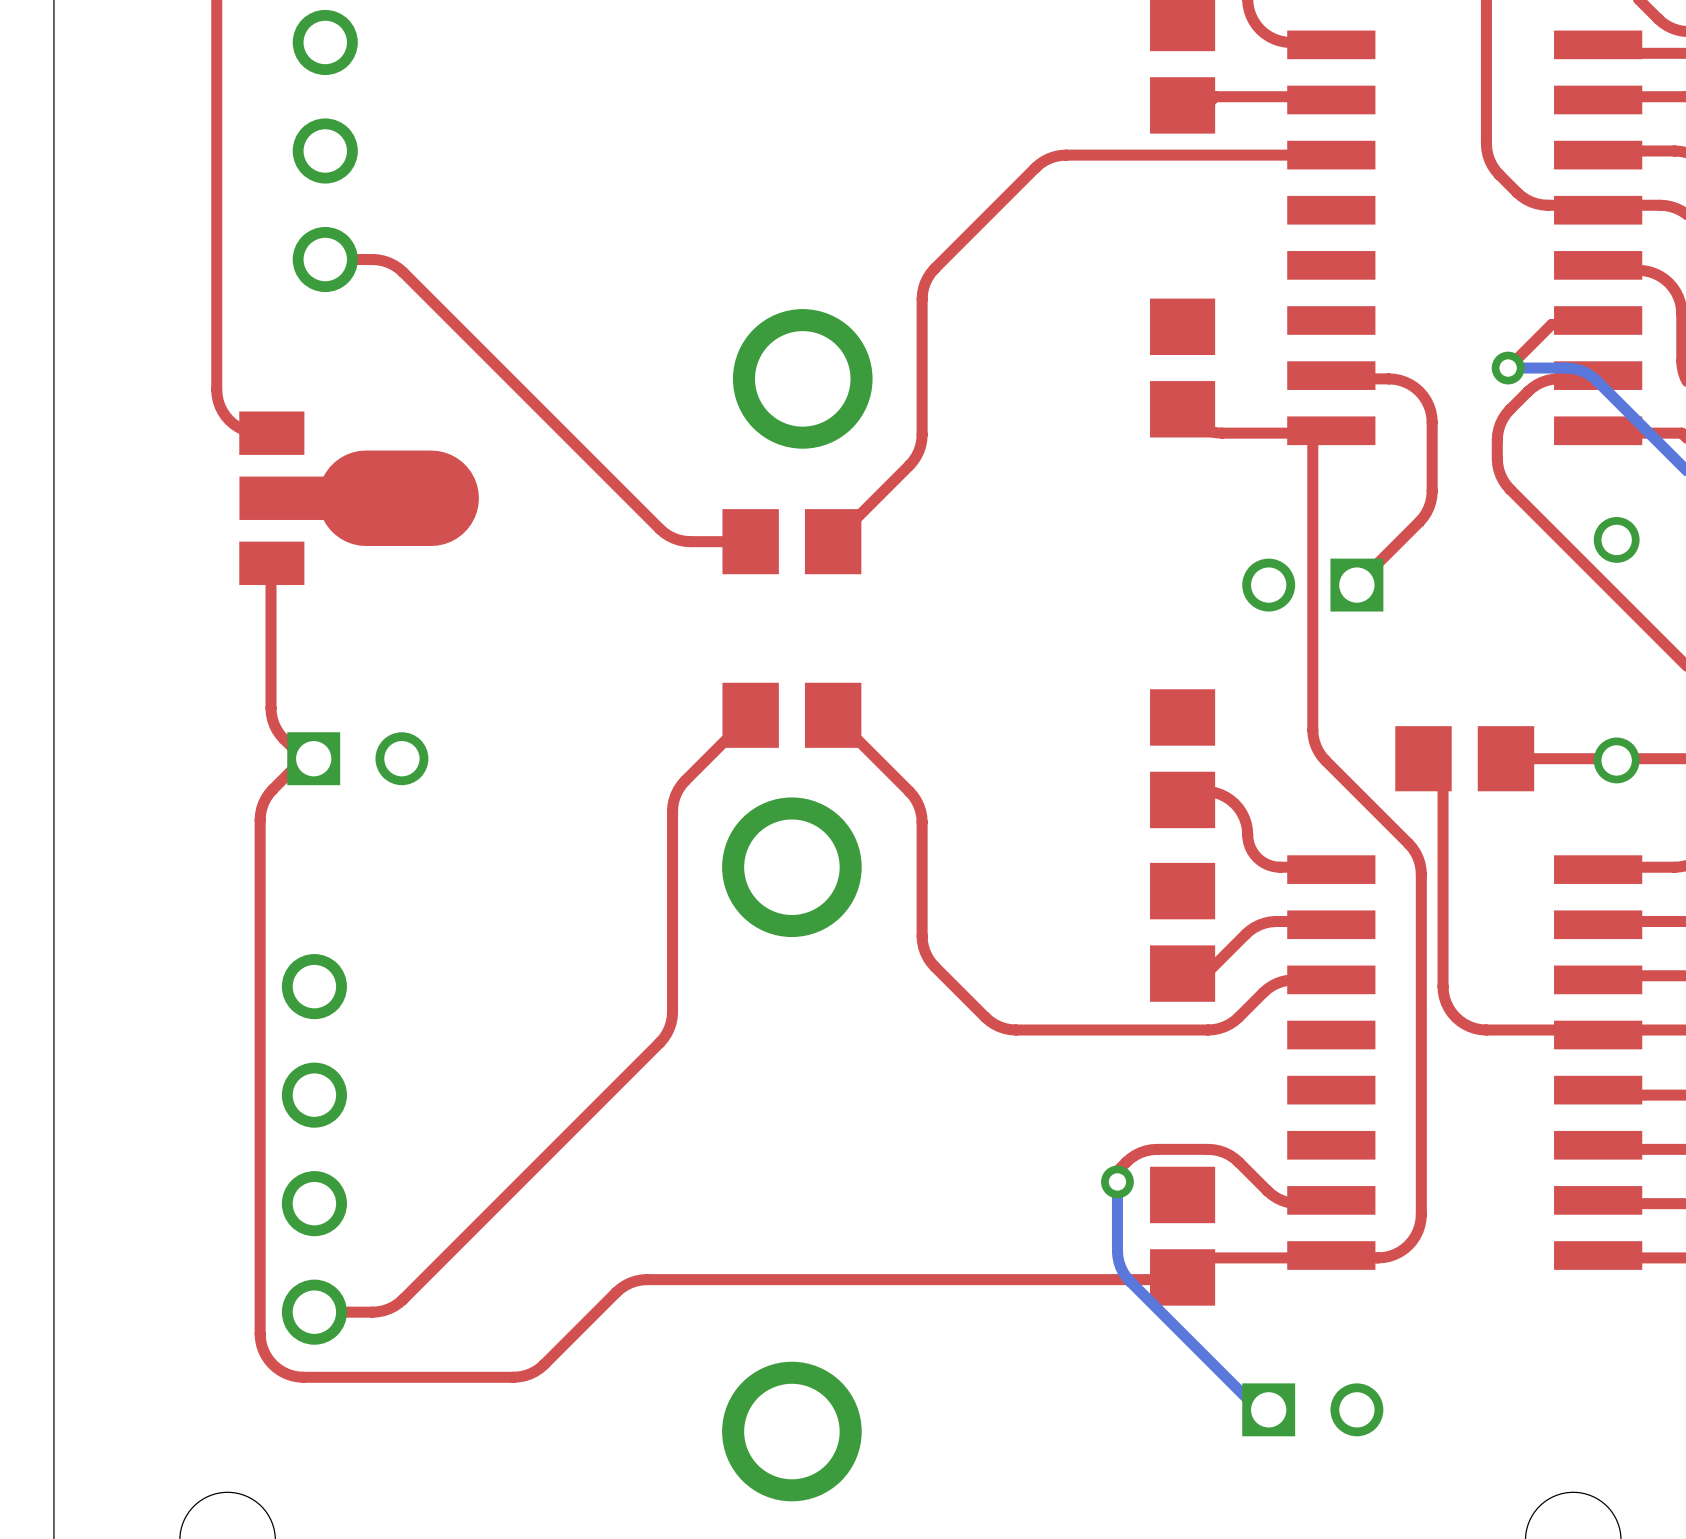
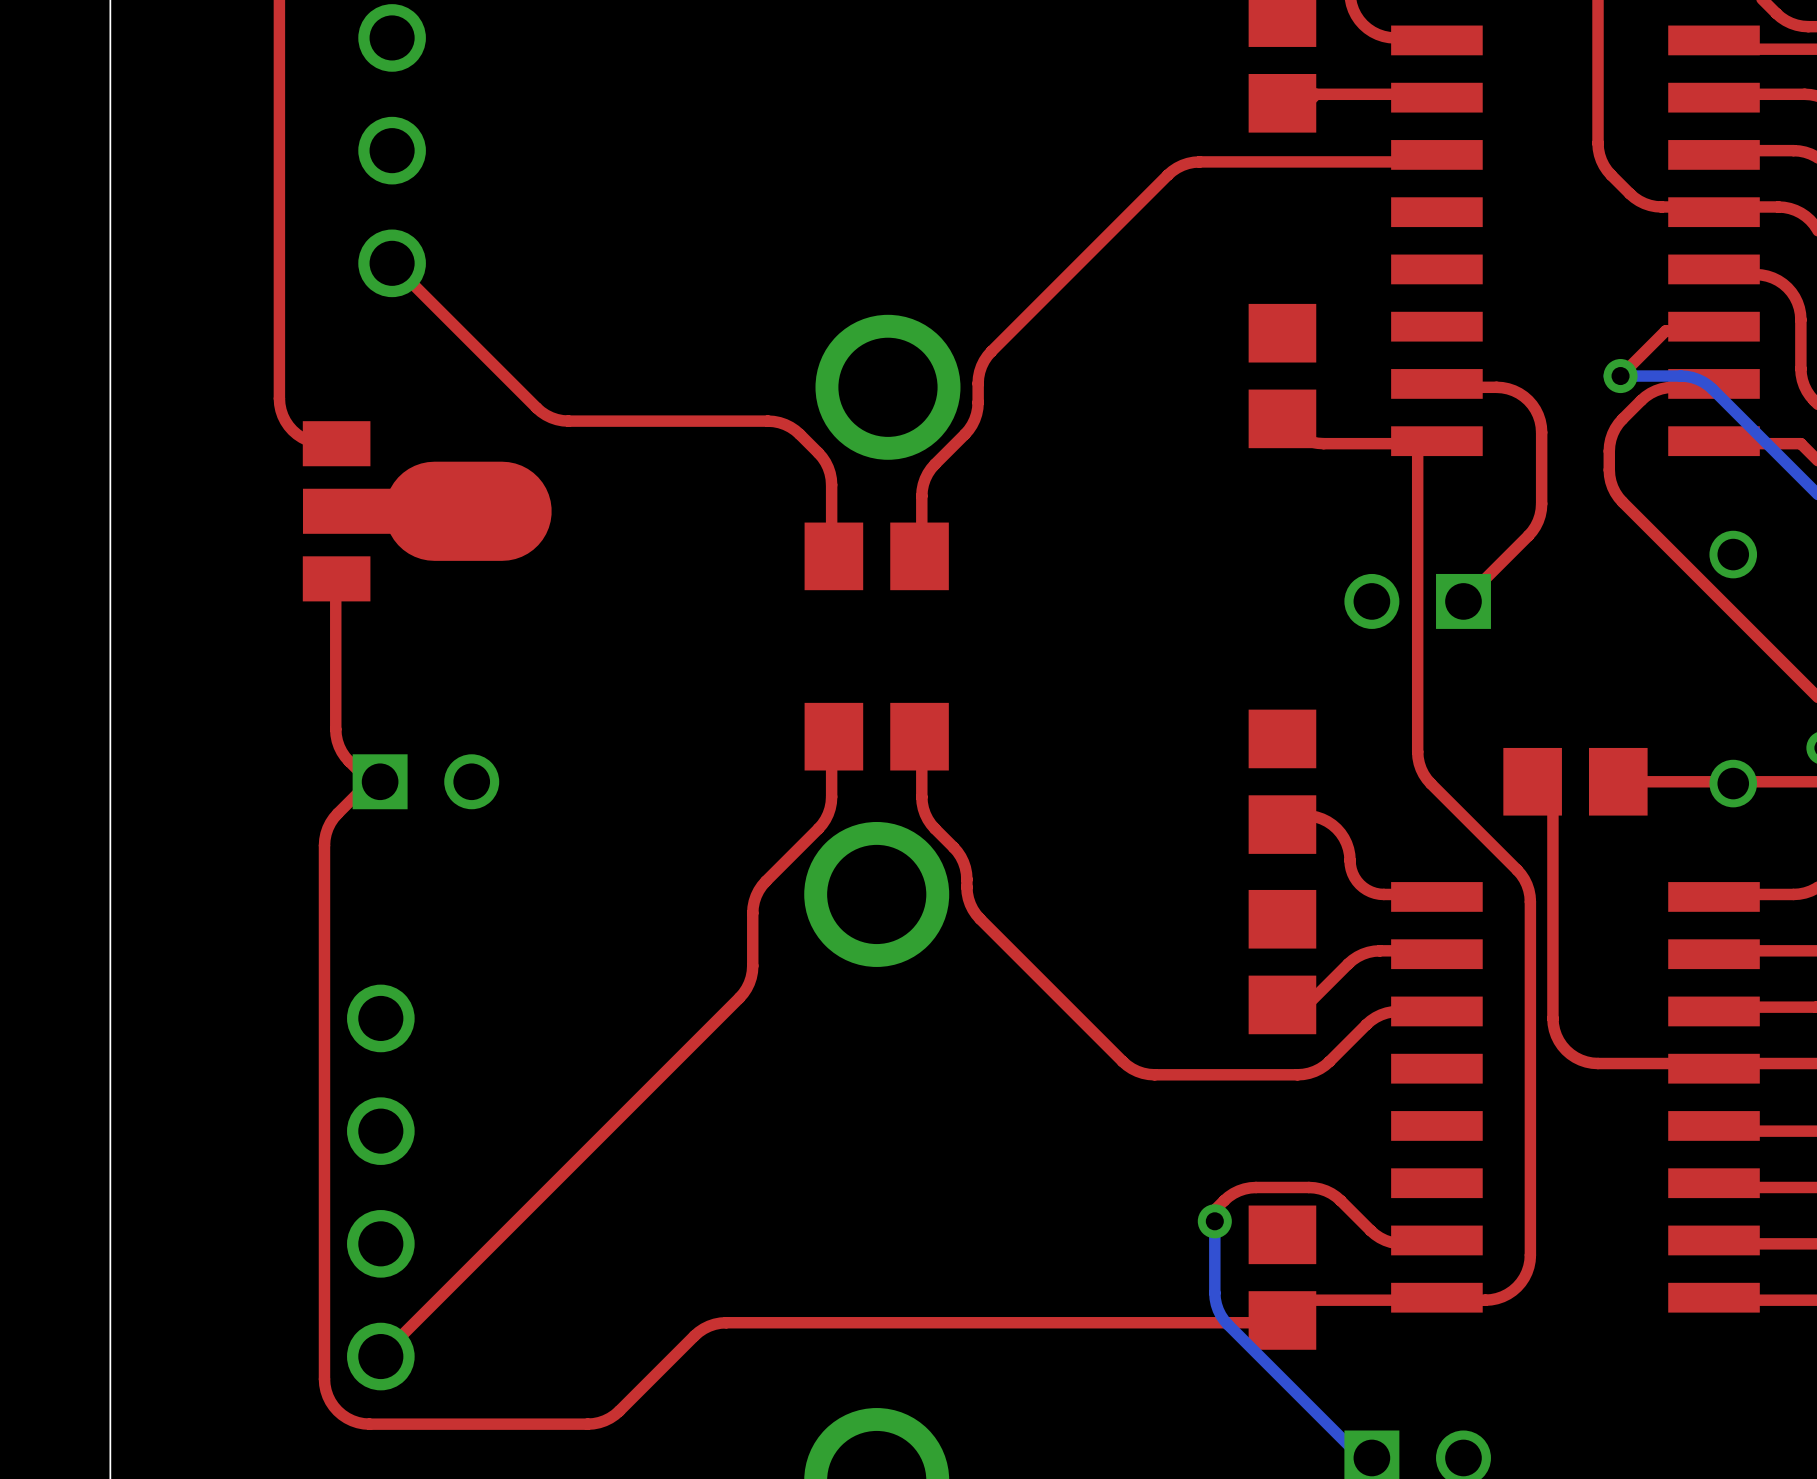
top track: (1331, 155) (1066, 155) (1054, 156) (1039, 164) (927, 277) (922, 299) (922, 434) (918, 451) (909, 465) (833, 541) -> (1436, 154) (1428, 150) (1406, 150) (1395, 161) (1199, 161) (1182, 165) (1172, 171) (984, 360) (978, 377) (977, 408) (974, 419) (964, 434) (931, 468) (923, 484) (921, 556) (919, 556)
top track: (325, 259) (378, 259) (398, 268) (668, 535) (684, 541) (748, 541) -> (392, 263) (536, 407) (551, 417) (568, 421) (767, 421) (779, 422) (790, 427) (822, 457) (830, 473) (831, 556)
top track: (750, 715) (685, 780) (675, 794) (672, 811) (672, 885) -> (833, 736) (831, 736) (831, 796) (828, 814) (818, 828) (762, 885) (756, 895) (752, 913)
top track: (833, 715) (916, 800) (922, 822) (923, 947) (934, 966) (989, 1021) (1004, 1028) (1016, 1030) (1208, 1030) (1224, 1026) (1238, 1017) -> (919, 736) (921, 736) (923, 808) (931, 824) (957, 851) (963, 862) (968, 898) (972, 909) (1127, 1065) (1142, 1073) (1154, 1074) (1303, 1074) (1320, 1068) (1340, 1050)
top track: (672, 936) (672, 1017) (666, 1033) (659, 1042) (398, 1303) (378, 1311) (314, 1312) -> (752, 965) (749, 983) (739, 997) (380, 1356)

